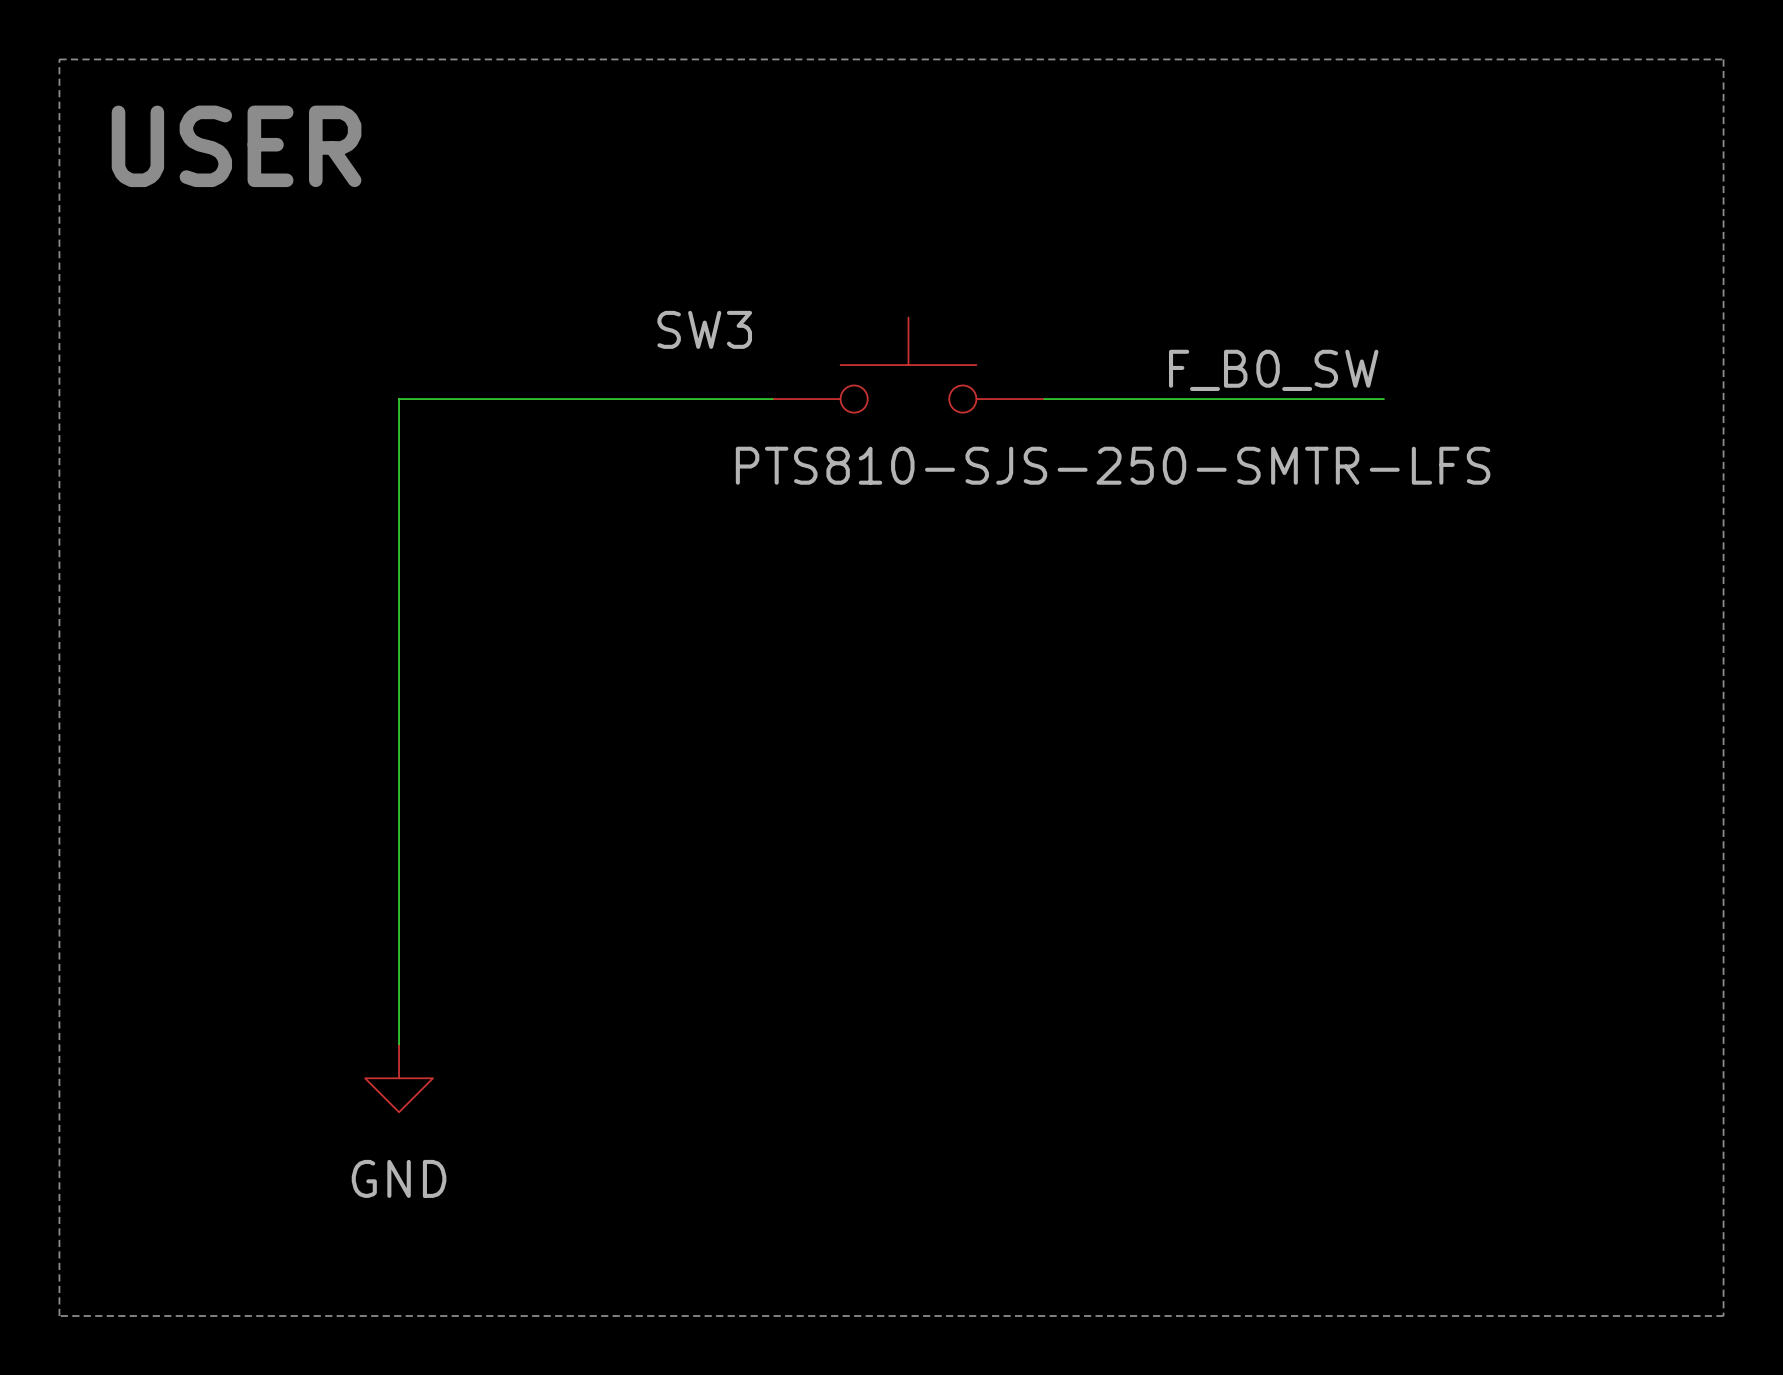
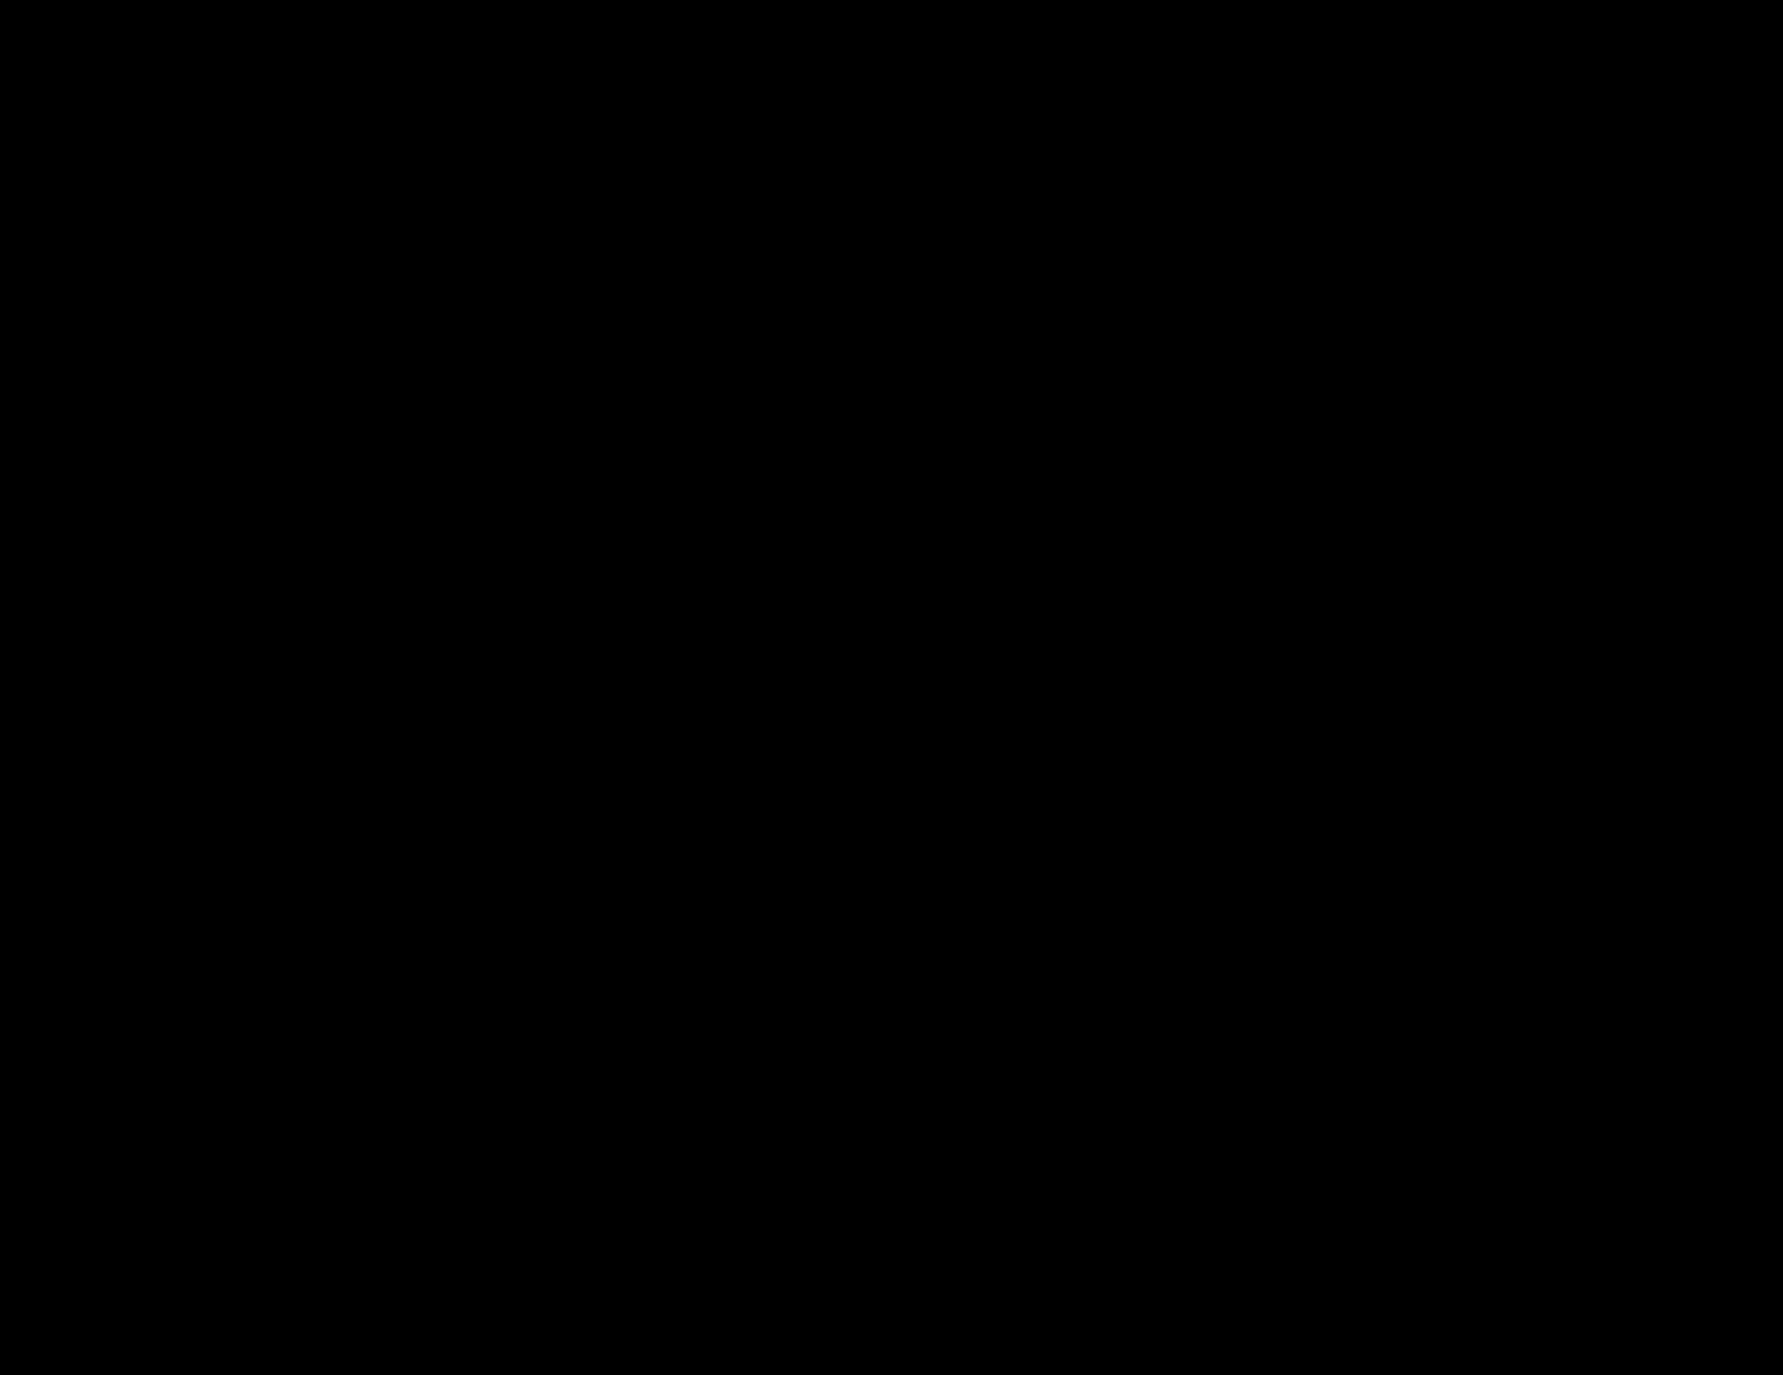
line: (59, 59) (1723, 59) (1723, 1316) (59, 1316) (59, 59) -> none
text: USER (236, 146) -> none
SW3: PTS810-SJS-250-SMTR-LFS (908, 365) -> none
label: F_B0_SW (1273, 370) -> none
wire: (772, 399) (399, 399) (399, 1044) -> none
wire: (1044, 399) (1383, 399) -> none
power symbol: GND (399, 1078) -> none

